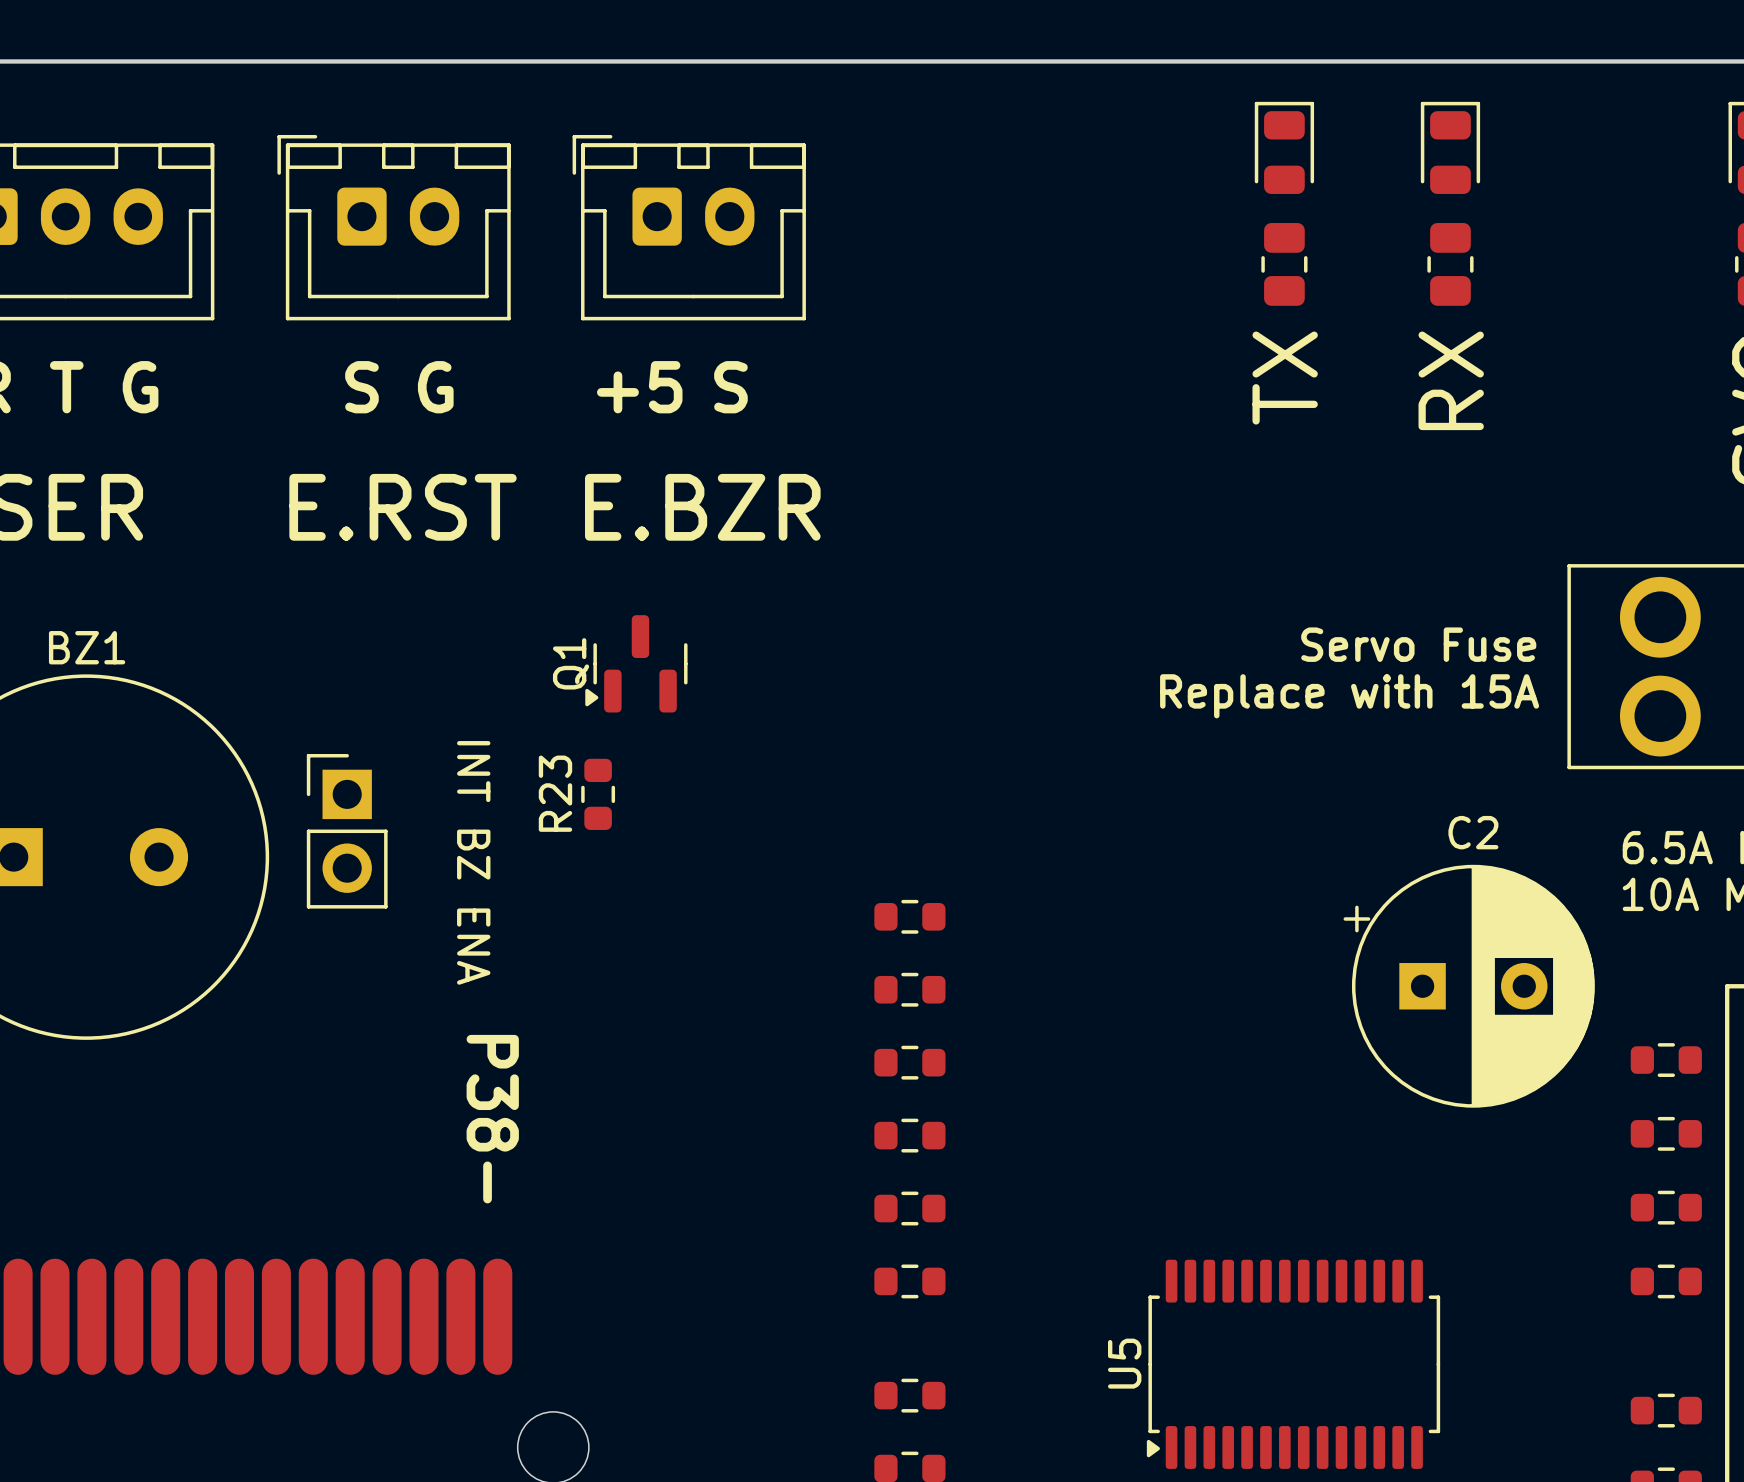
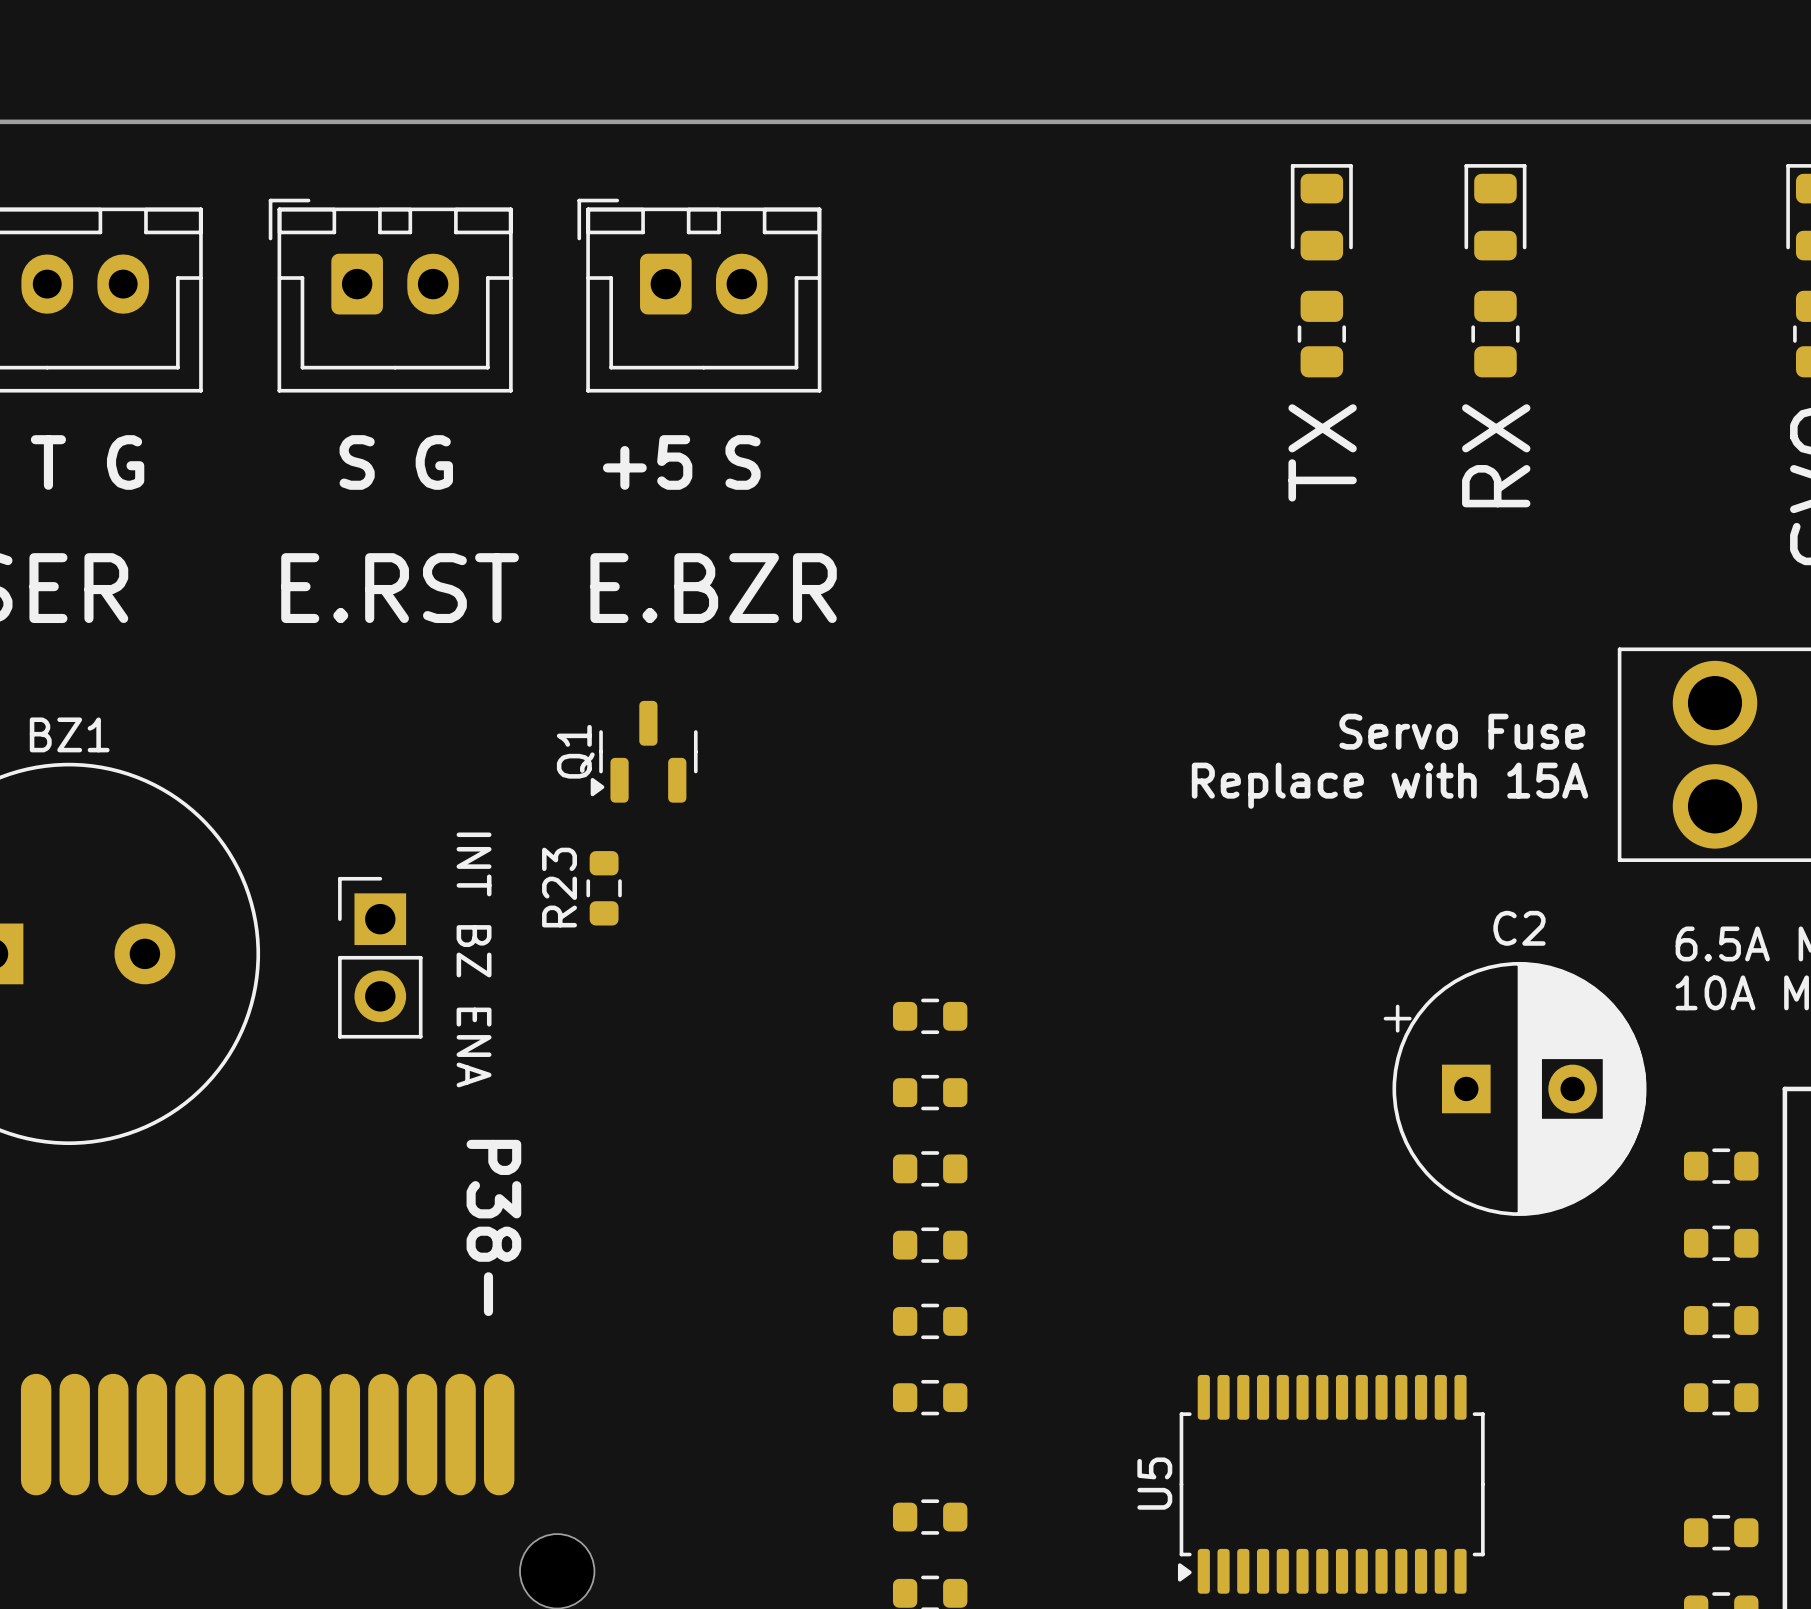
part position: (347, 831) -> (380, 957)

